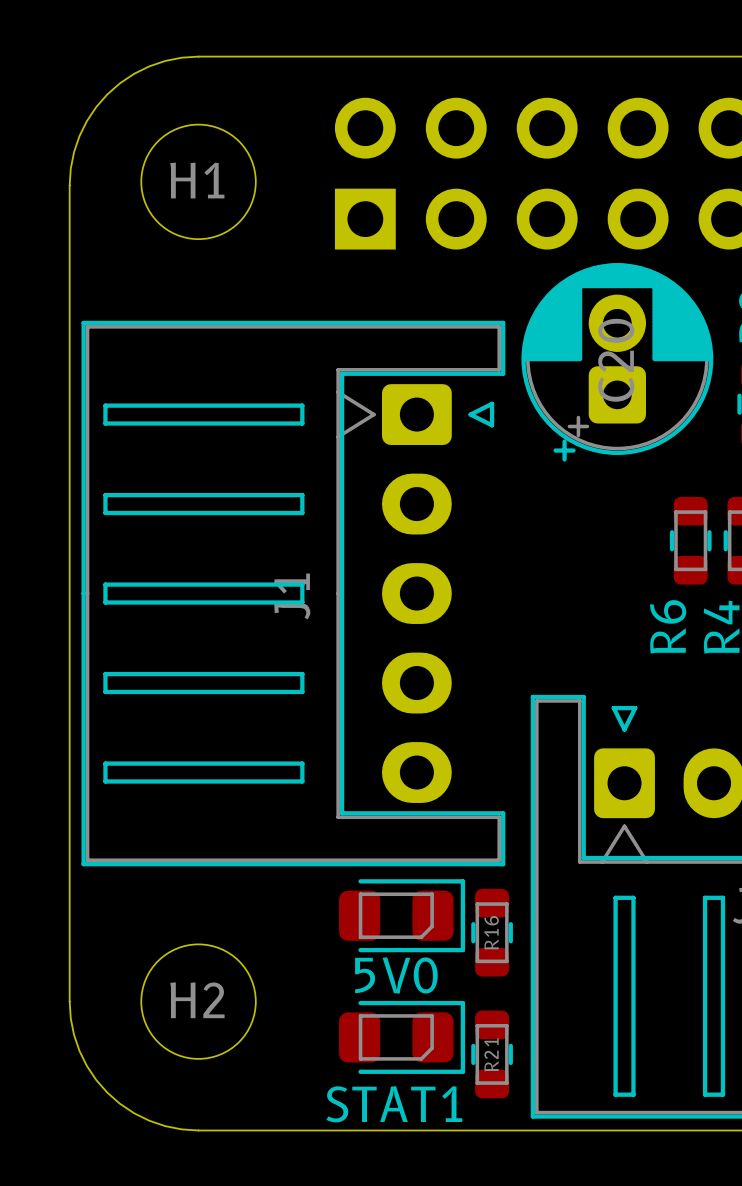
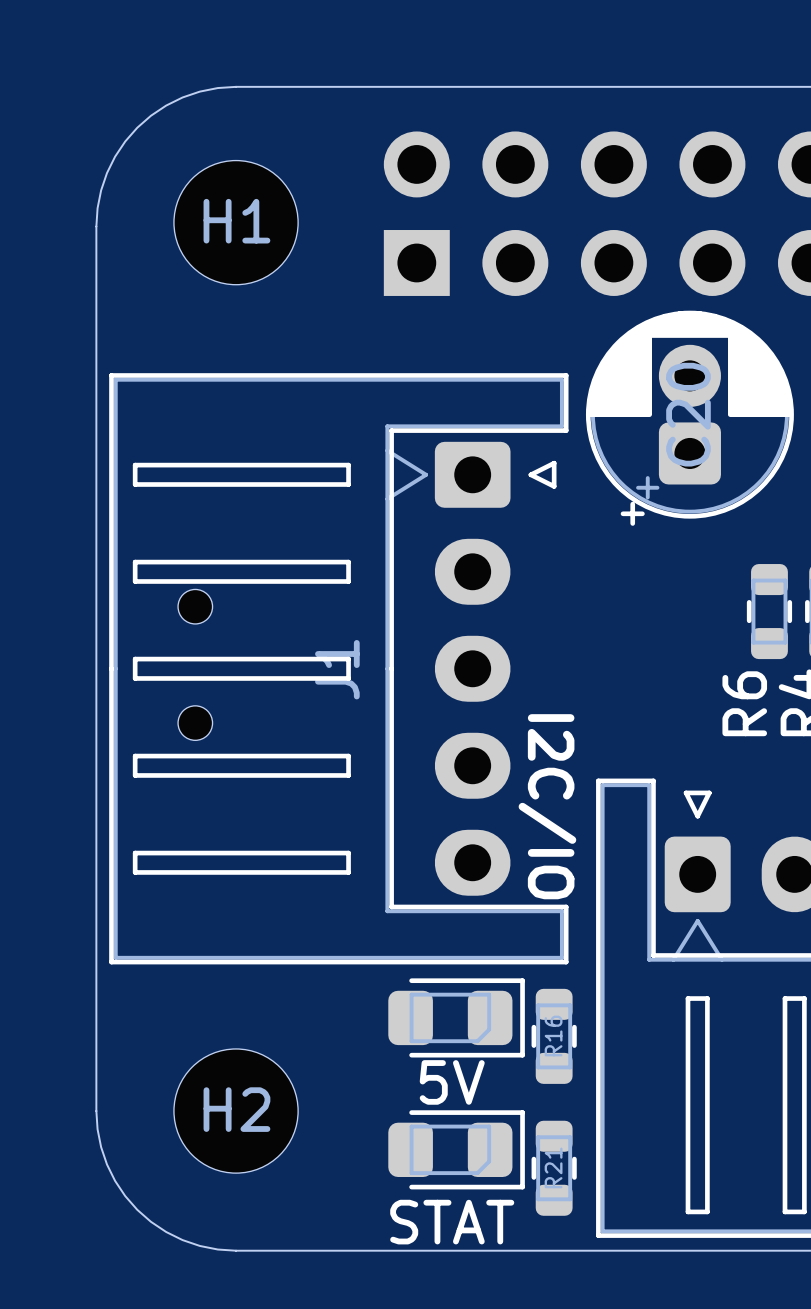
part: none -> (195, 664)
text: none -> I2C/IO (547, 806)
5V0 name: 5V0 (396, 975) -> 5V (452, 1082)
STAT1 name: STAT1 (394, 1104) -> STAT (452, 1222)

